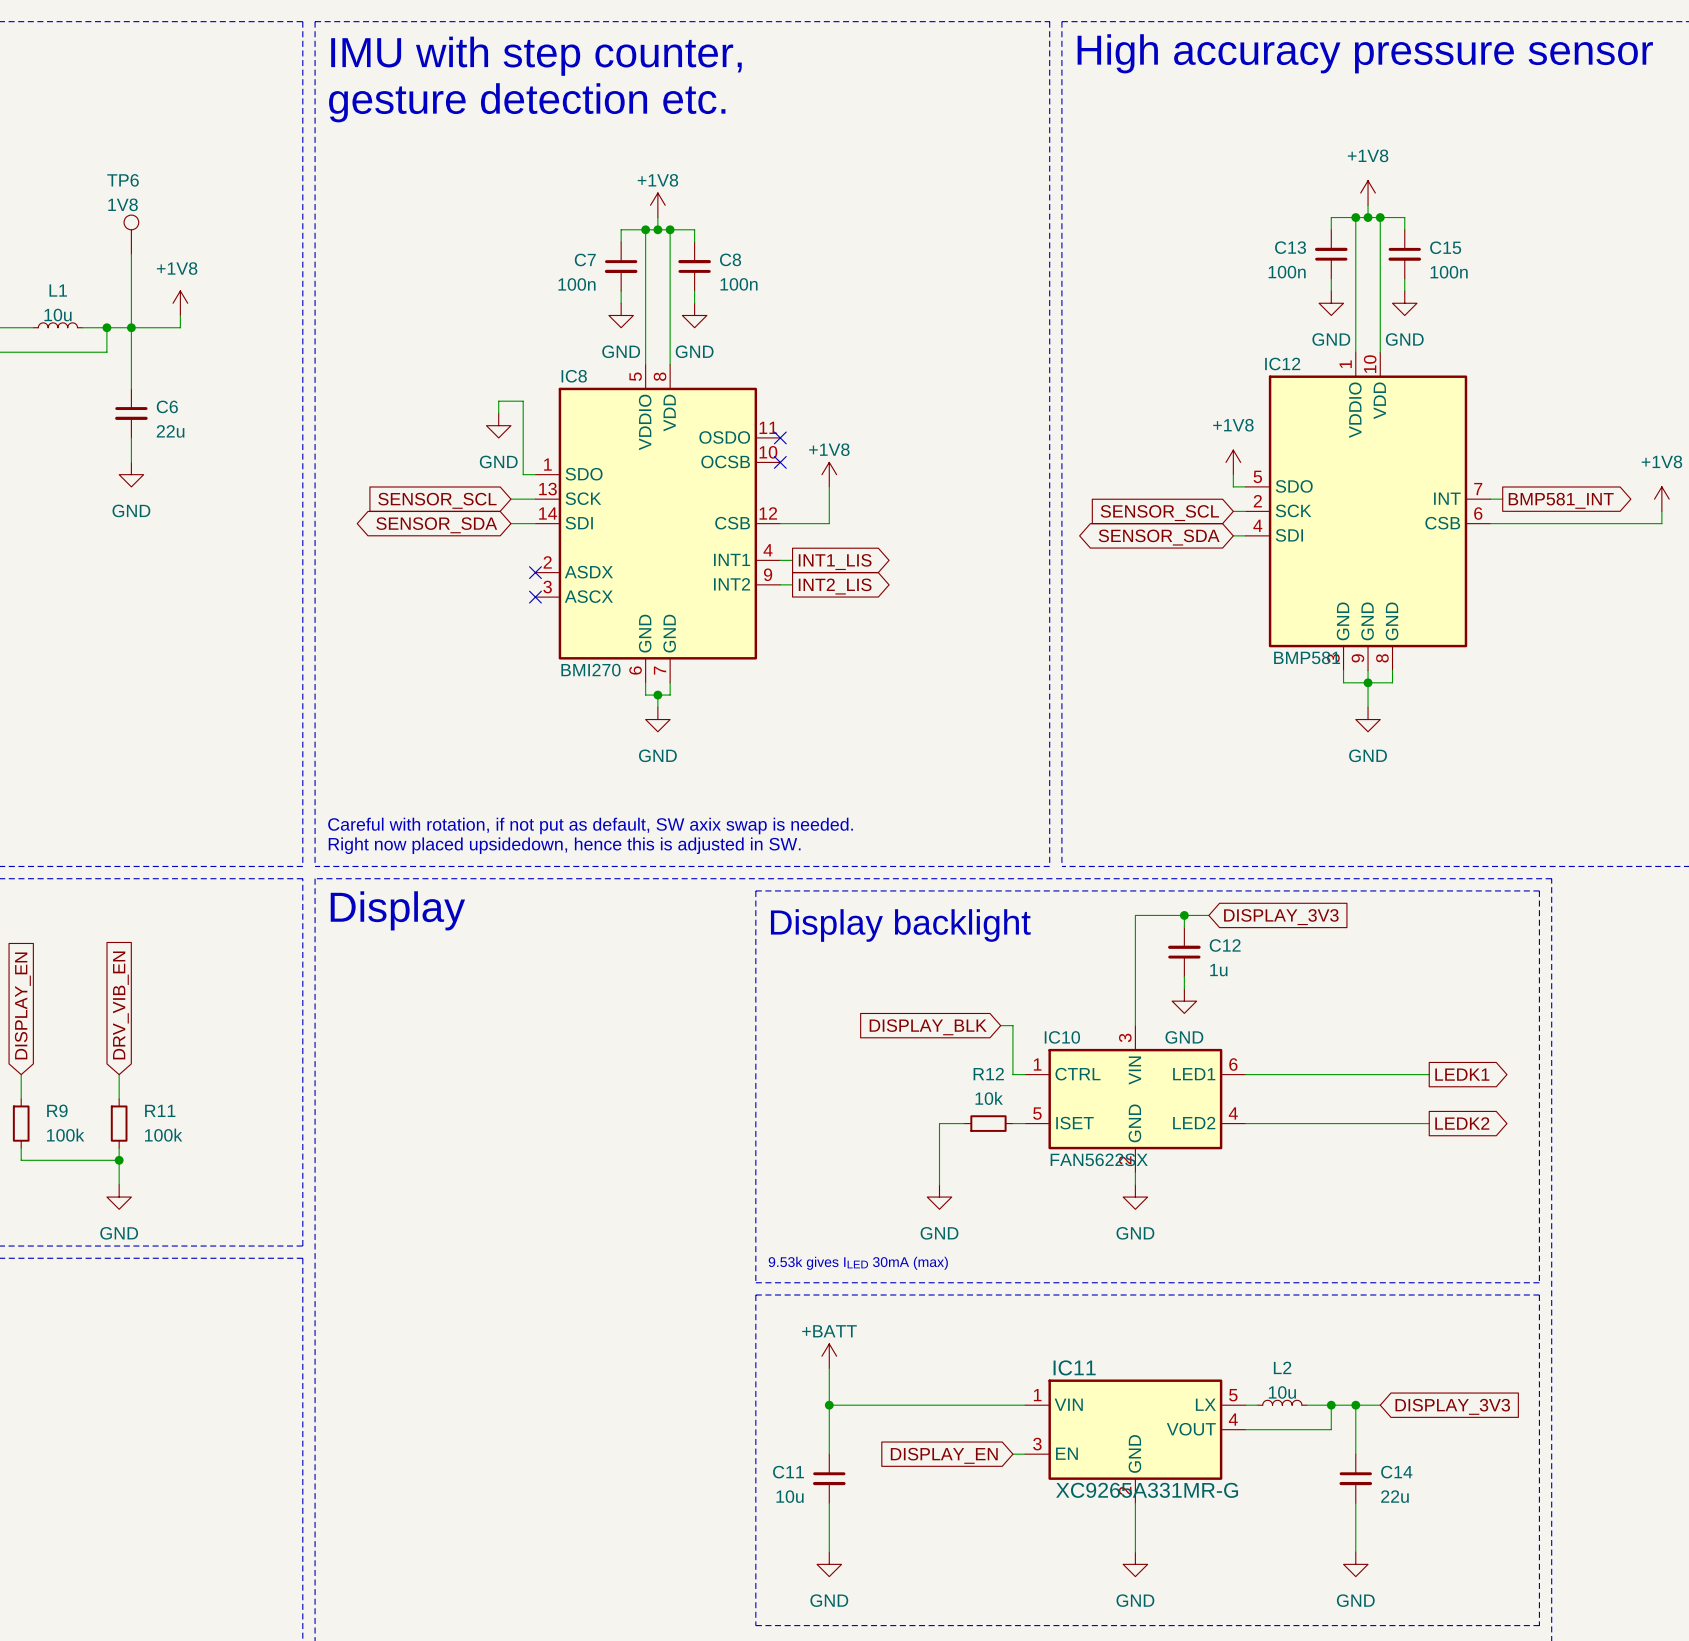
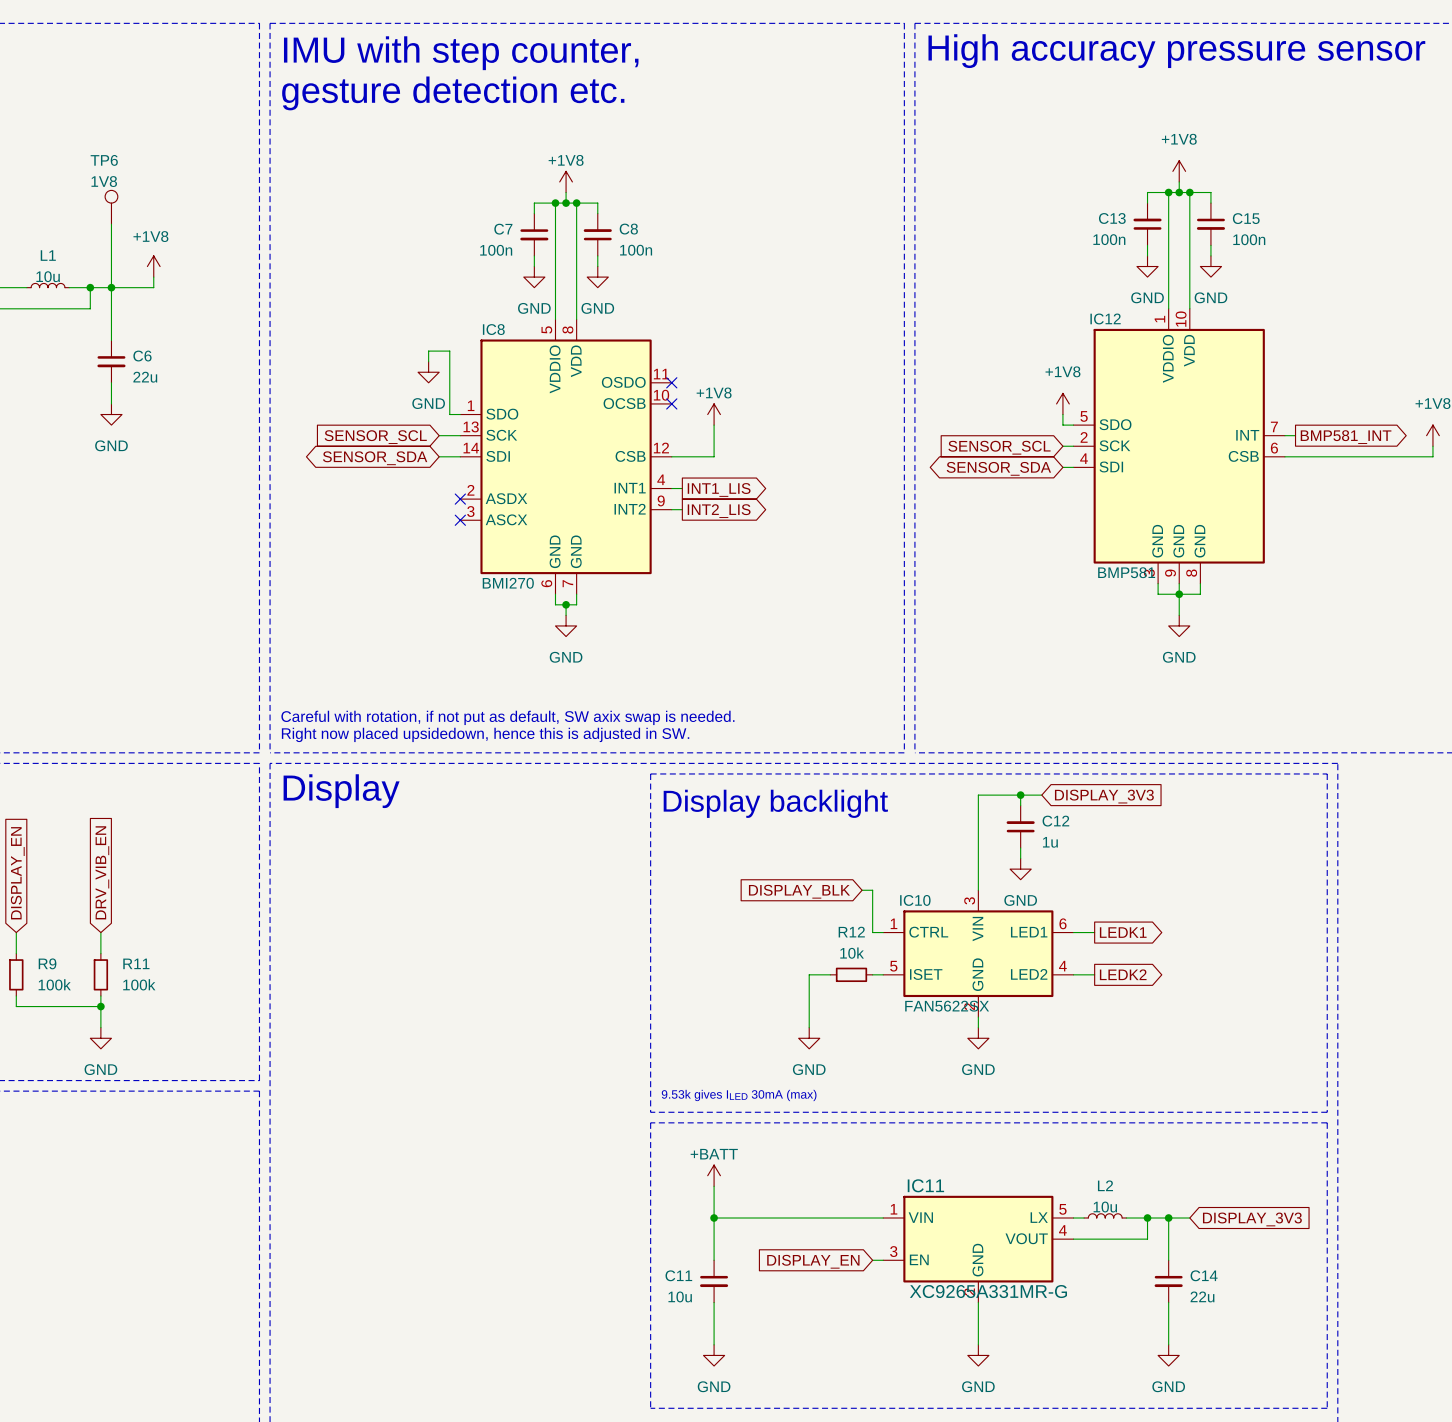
wire: (1270, 1074) (1429, 1074) -> none
global label position: LEDK1 (1462, 1074) -> LEDK1 (1123, 932)
wire: (1270, 1123) (1429, 1123) -> none
global label position: LEDK2 (1462, 1123) -> LEDK2 (1123, 974)

